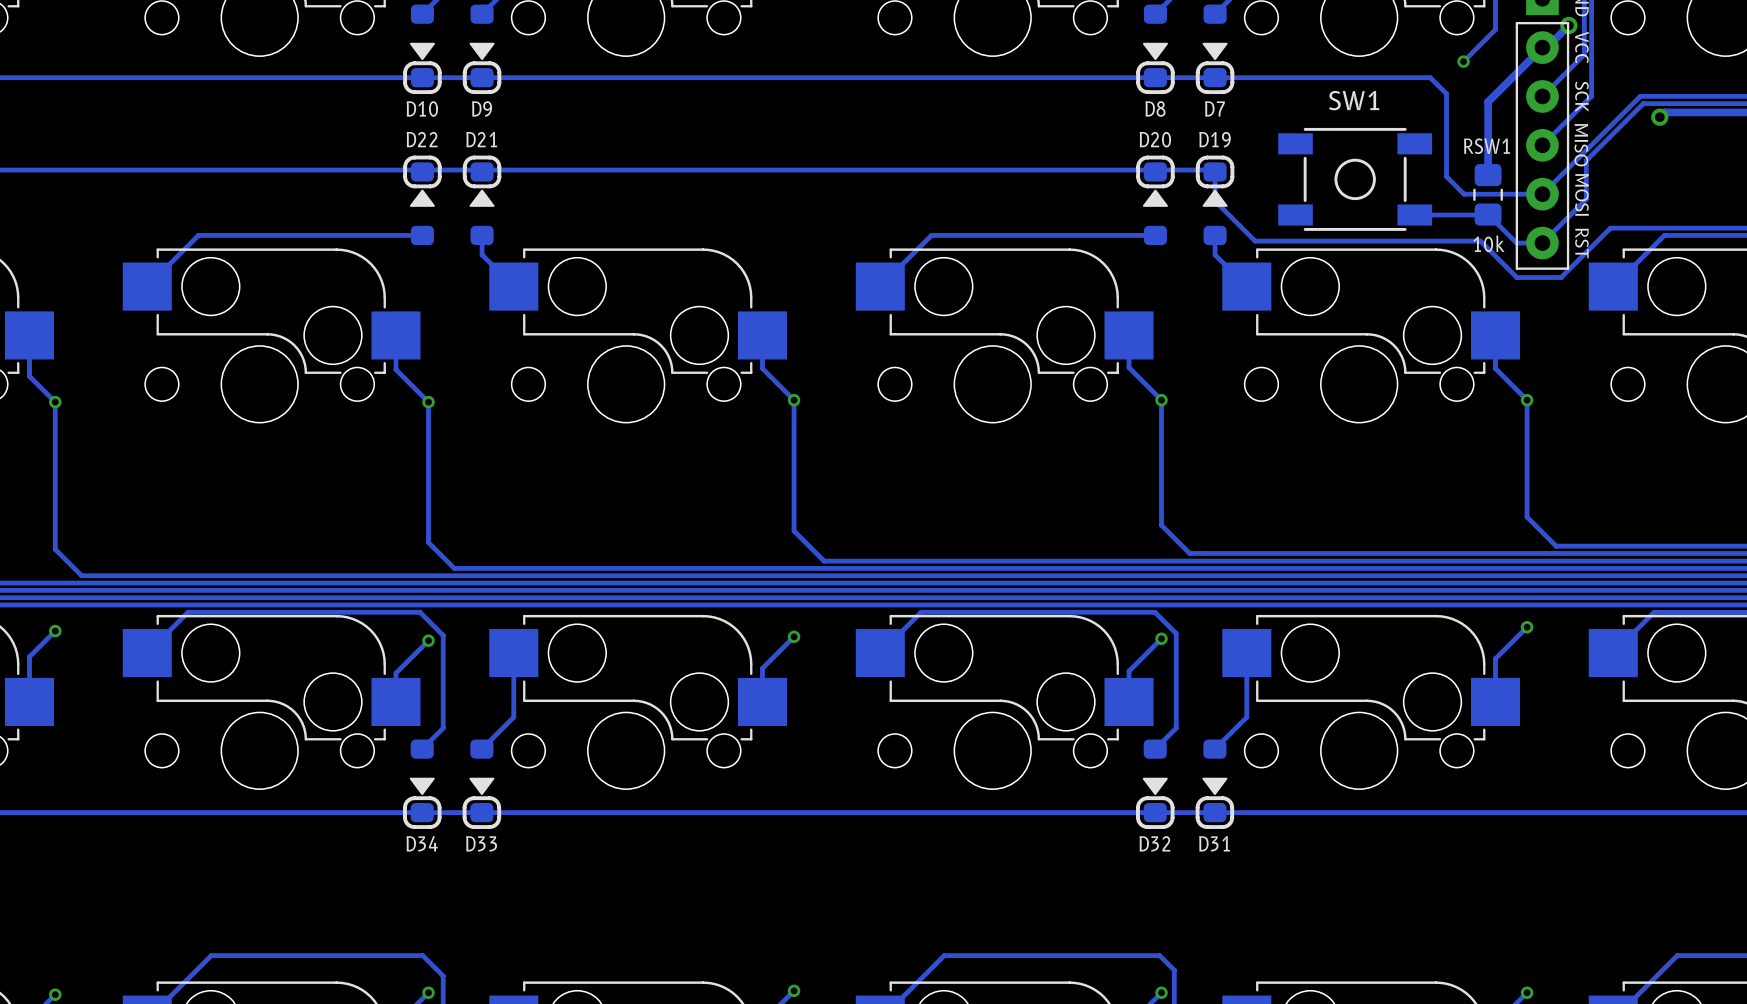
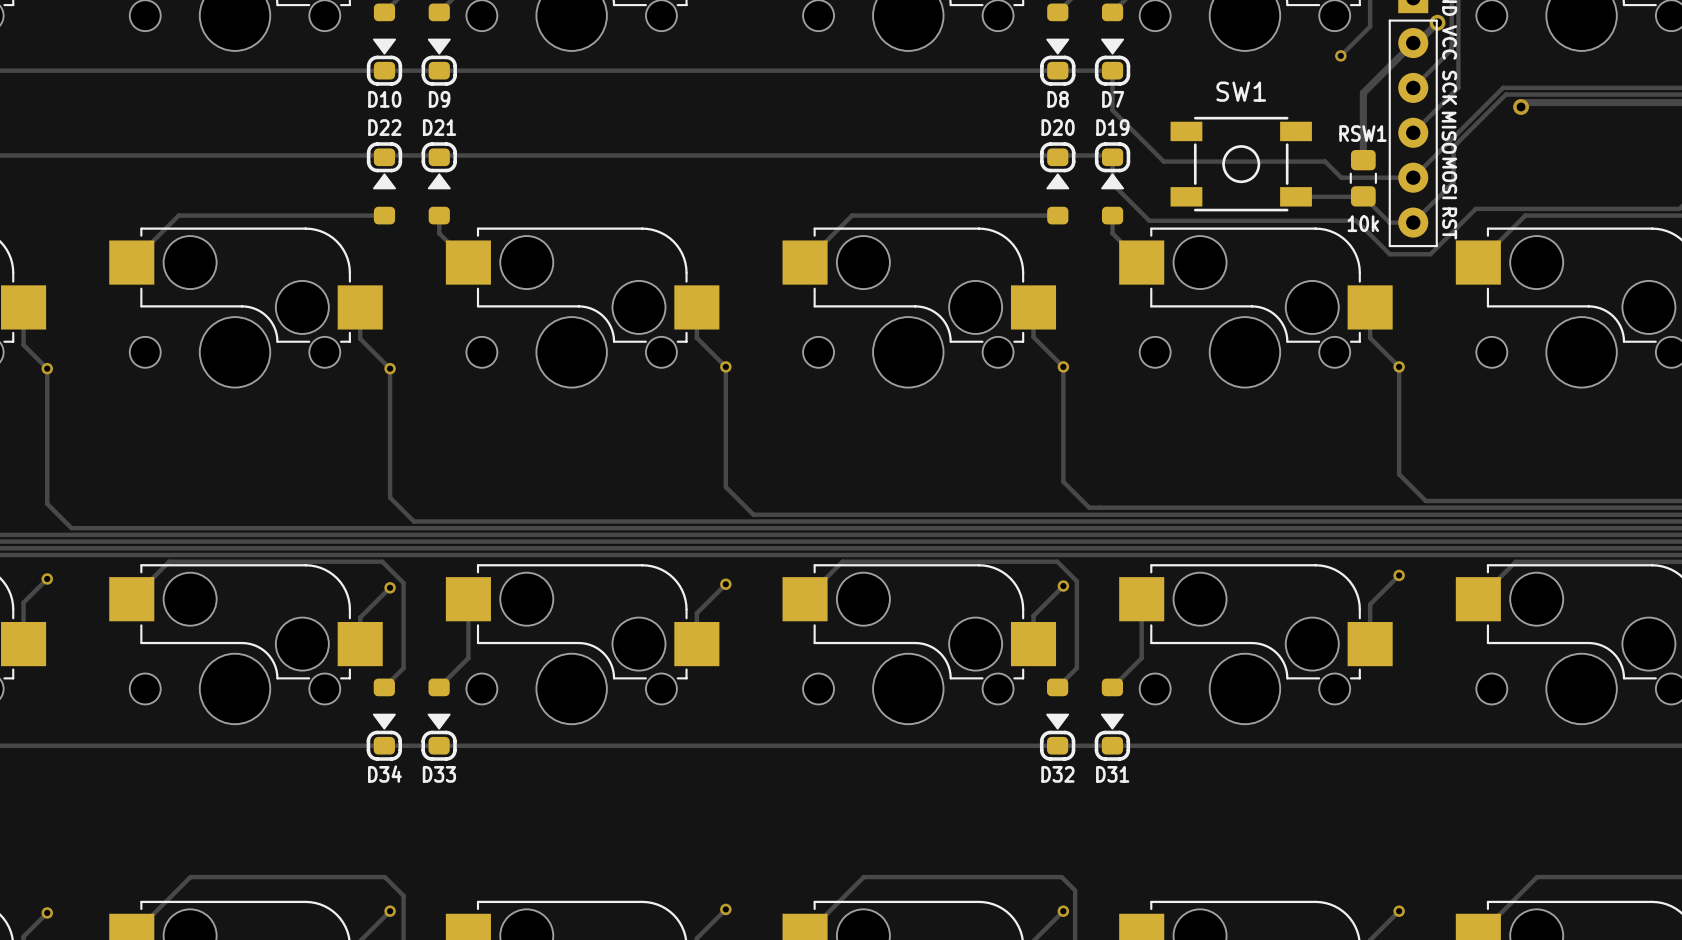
track: (1215, 77) (1430, 77) (1446, 93) (1446, 176) -> (1112, 70) (1112, 110) (1163, 161) (1325, 161)

